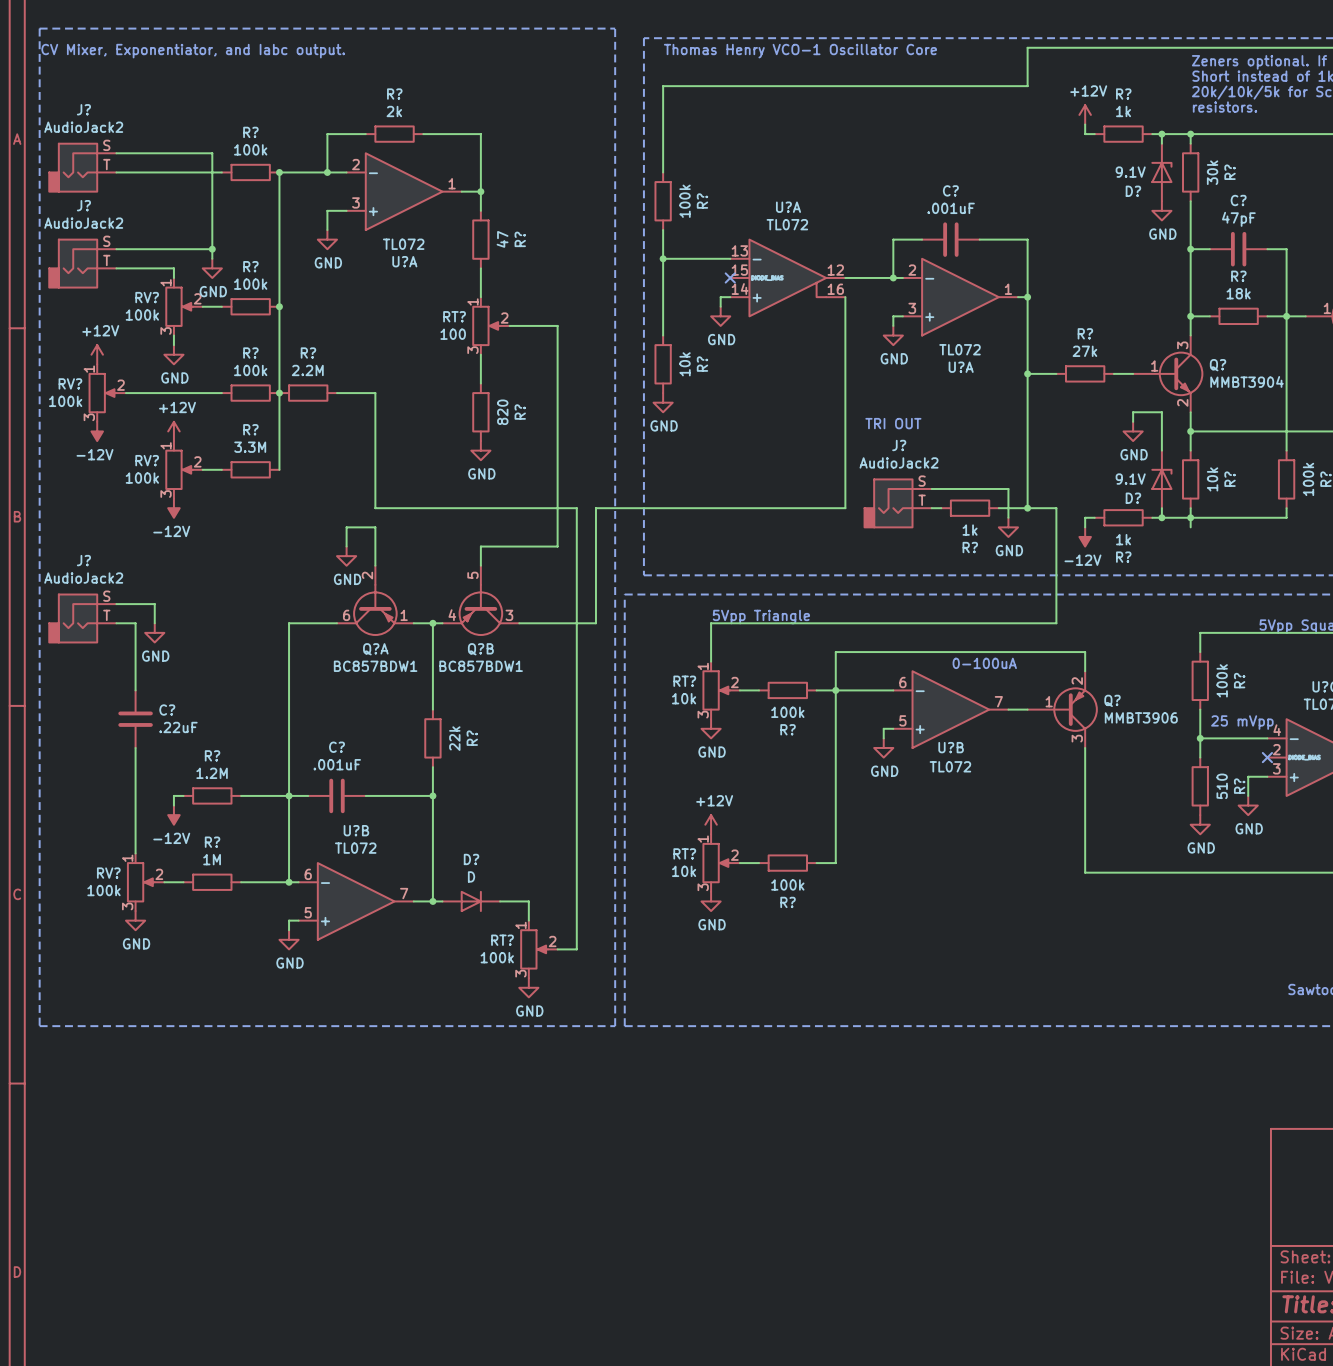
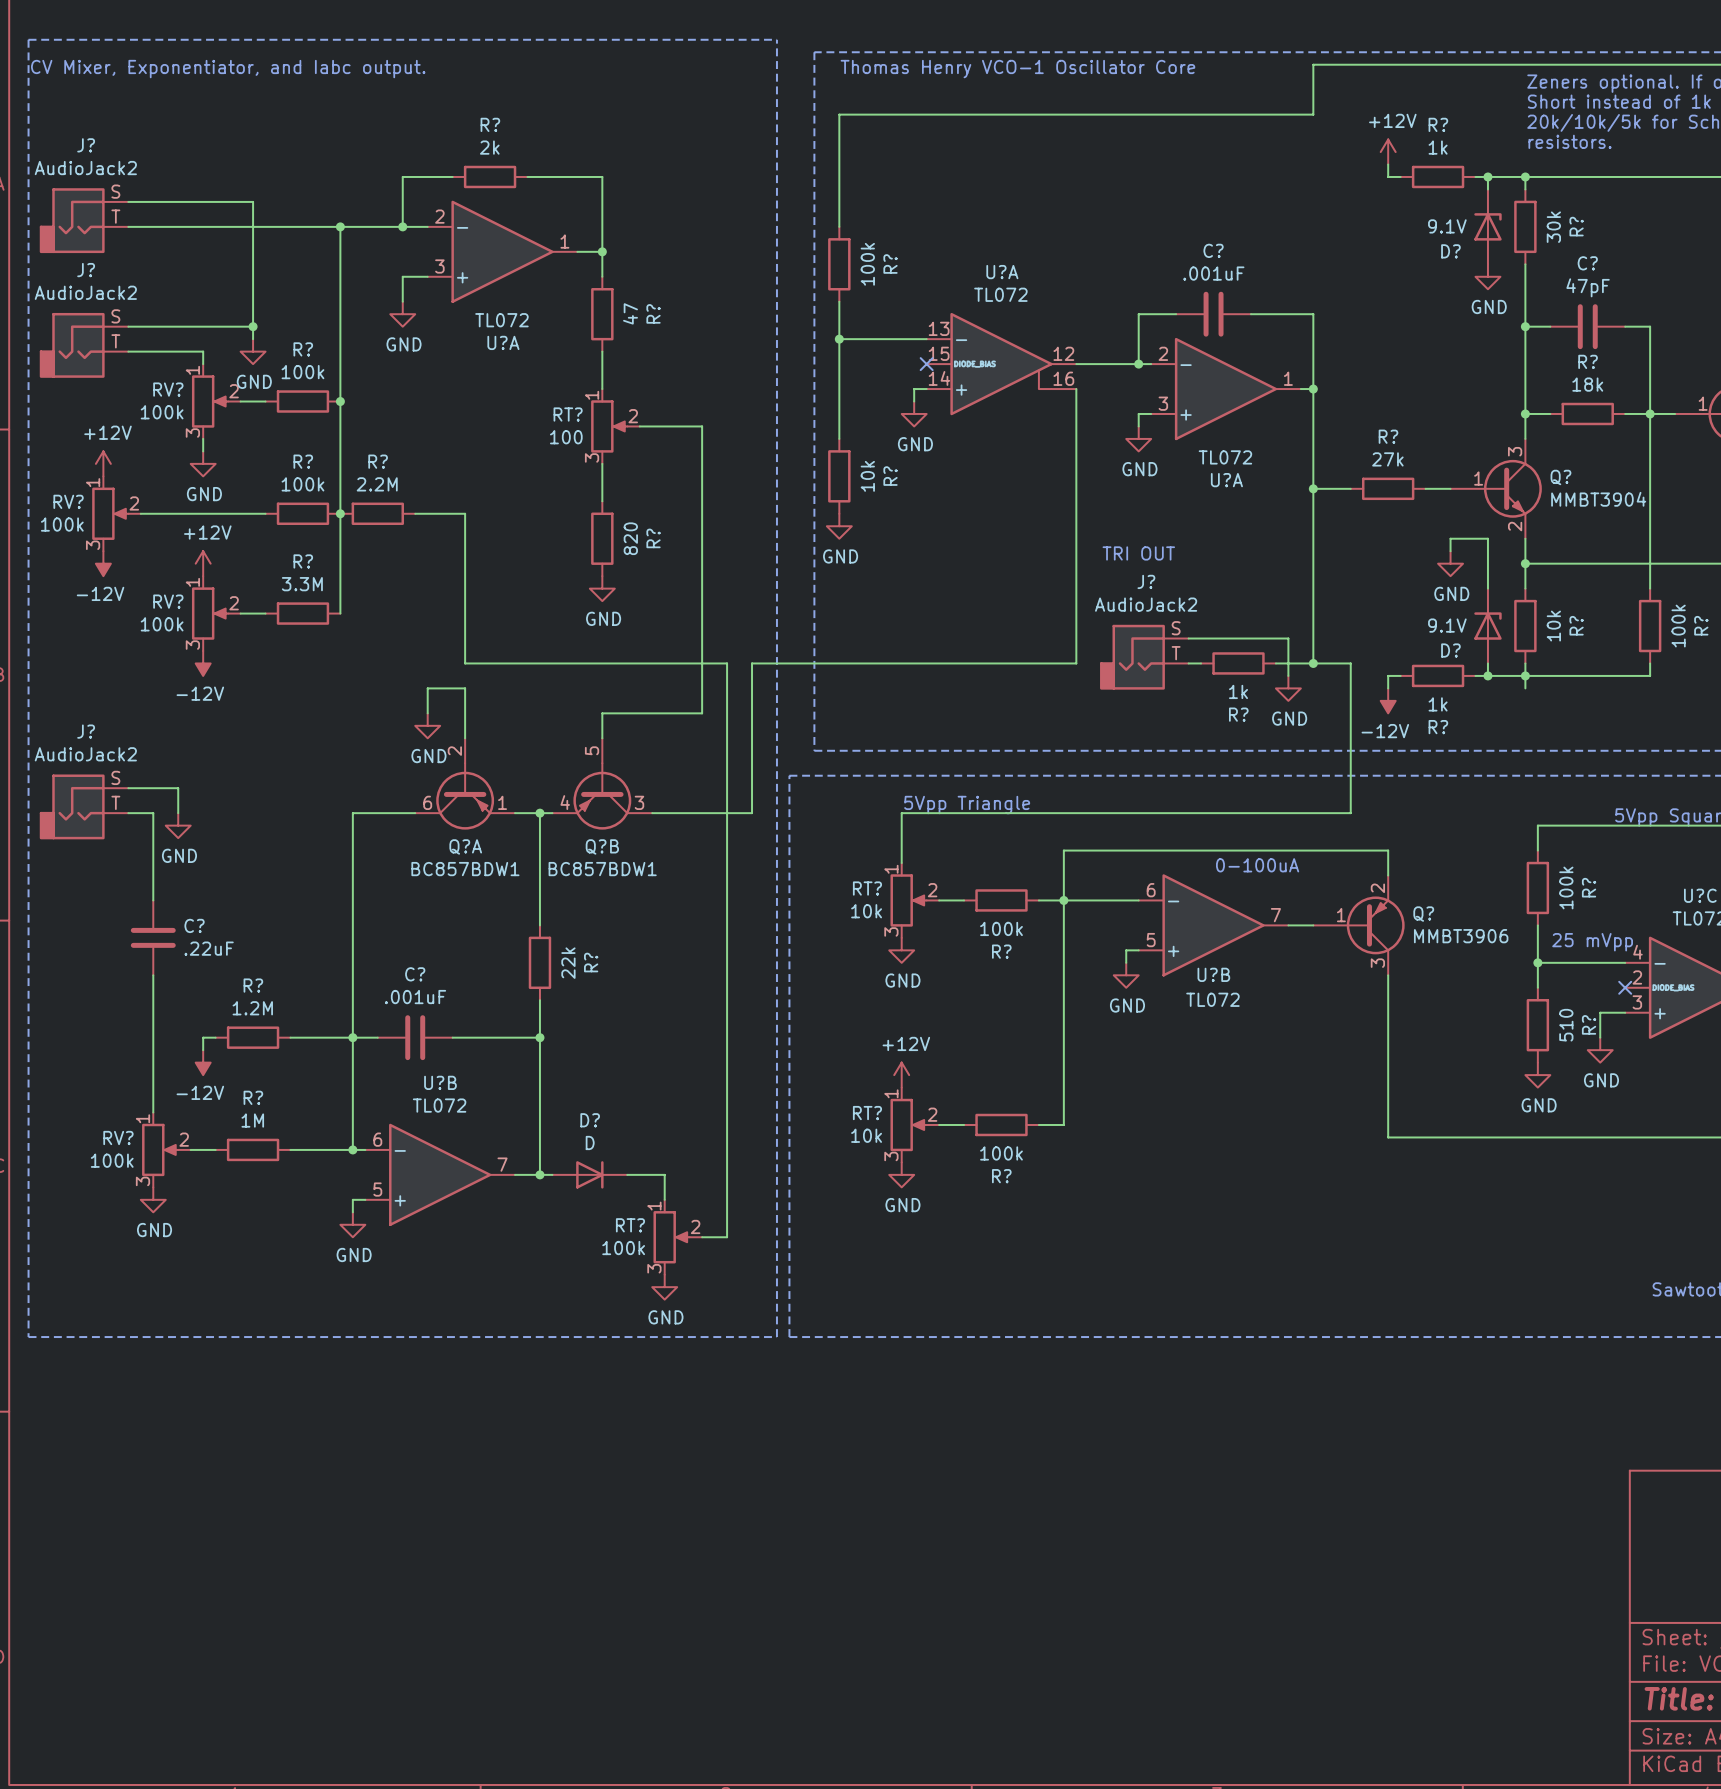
wire: none -> (265, 226) (340, 226)
R?: 100k (250, 172) -> none

